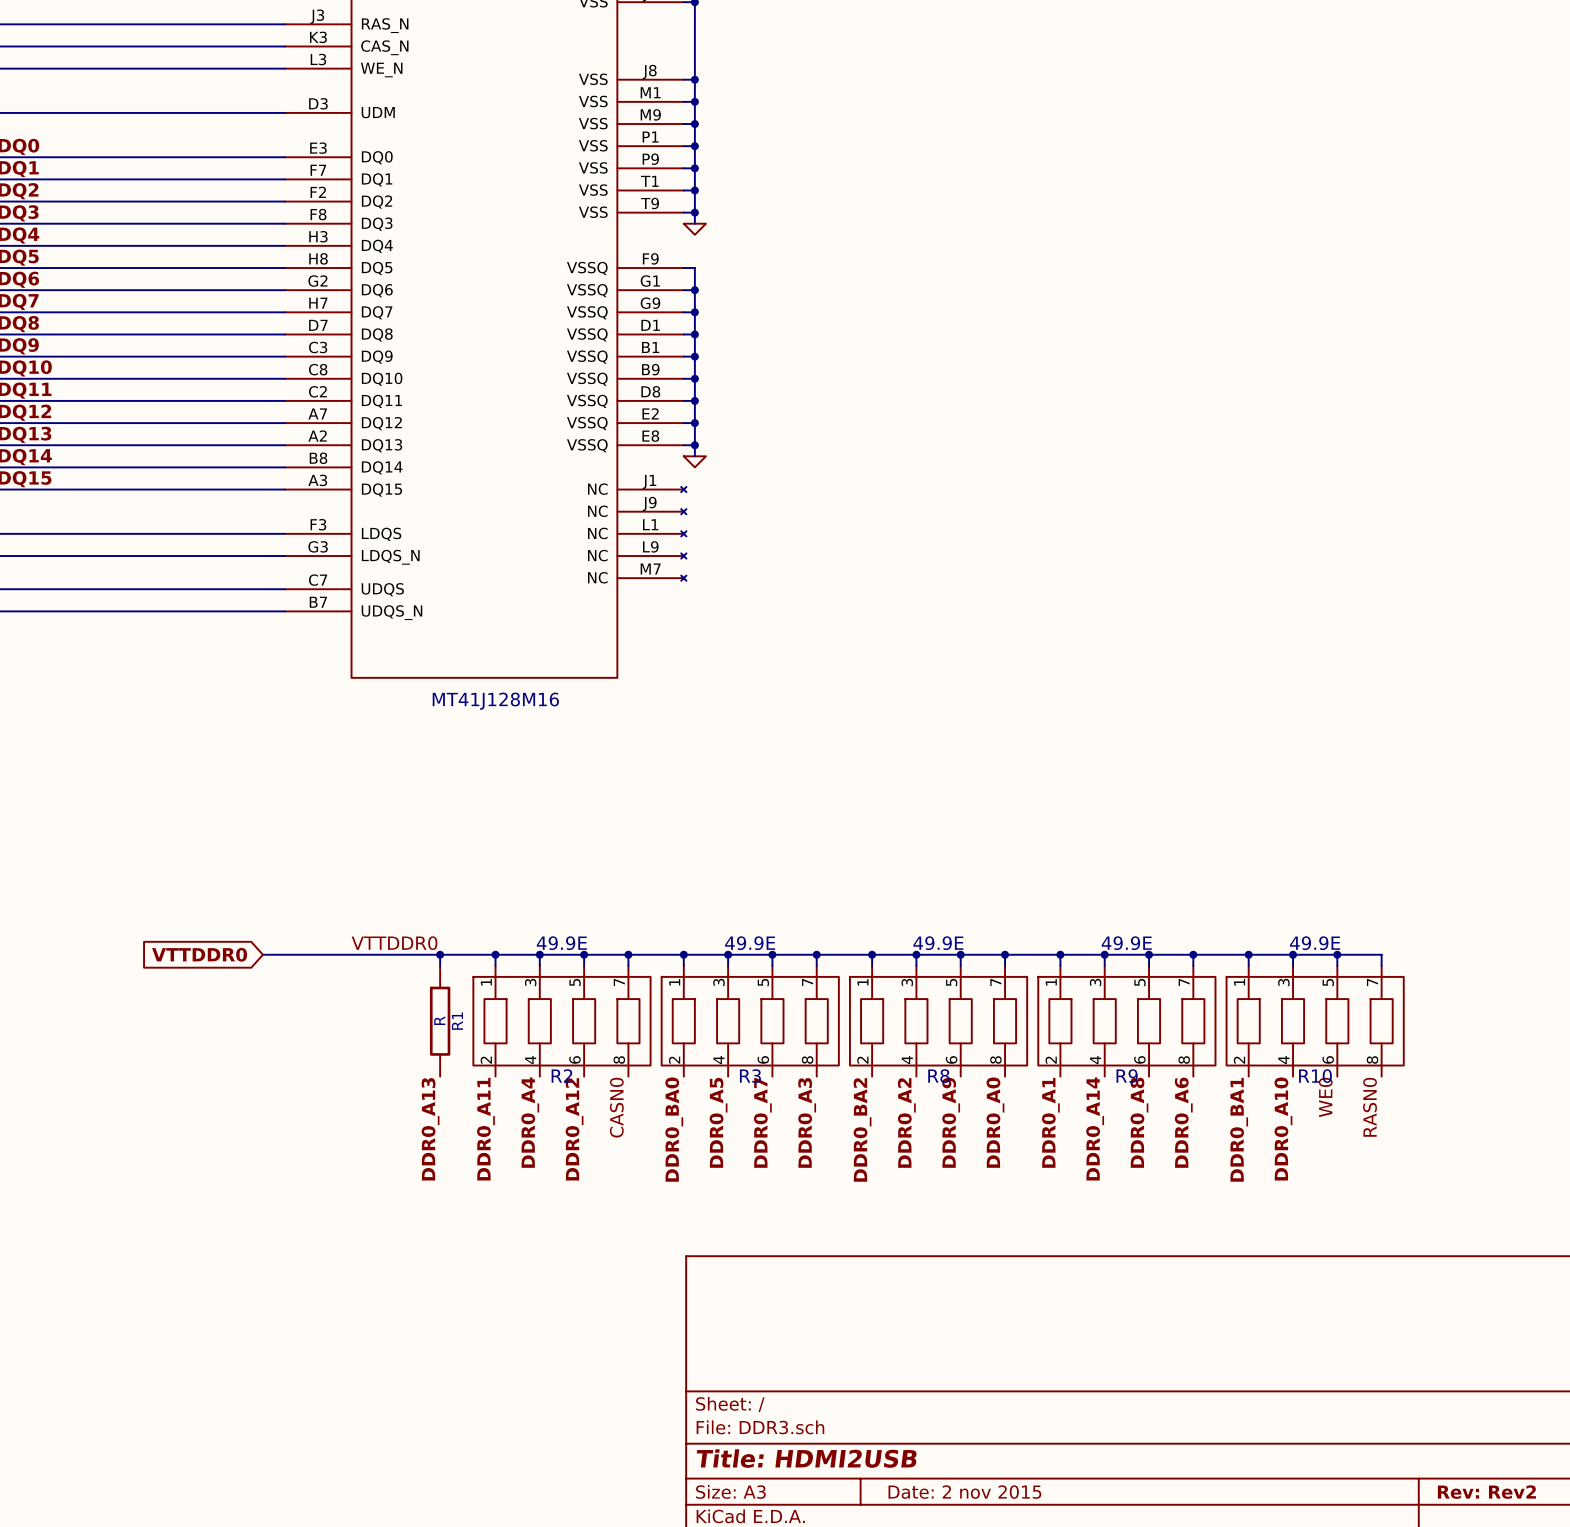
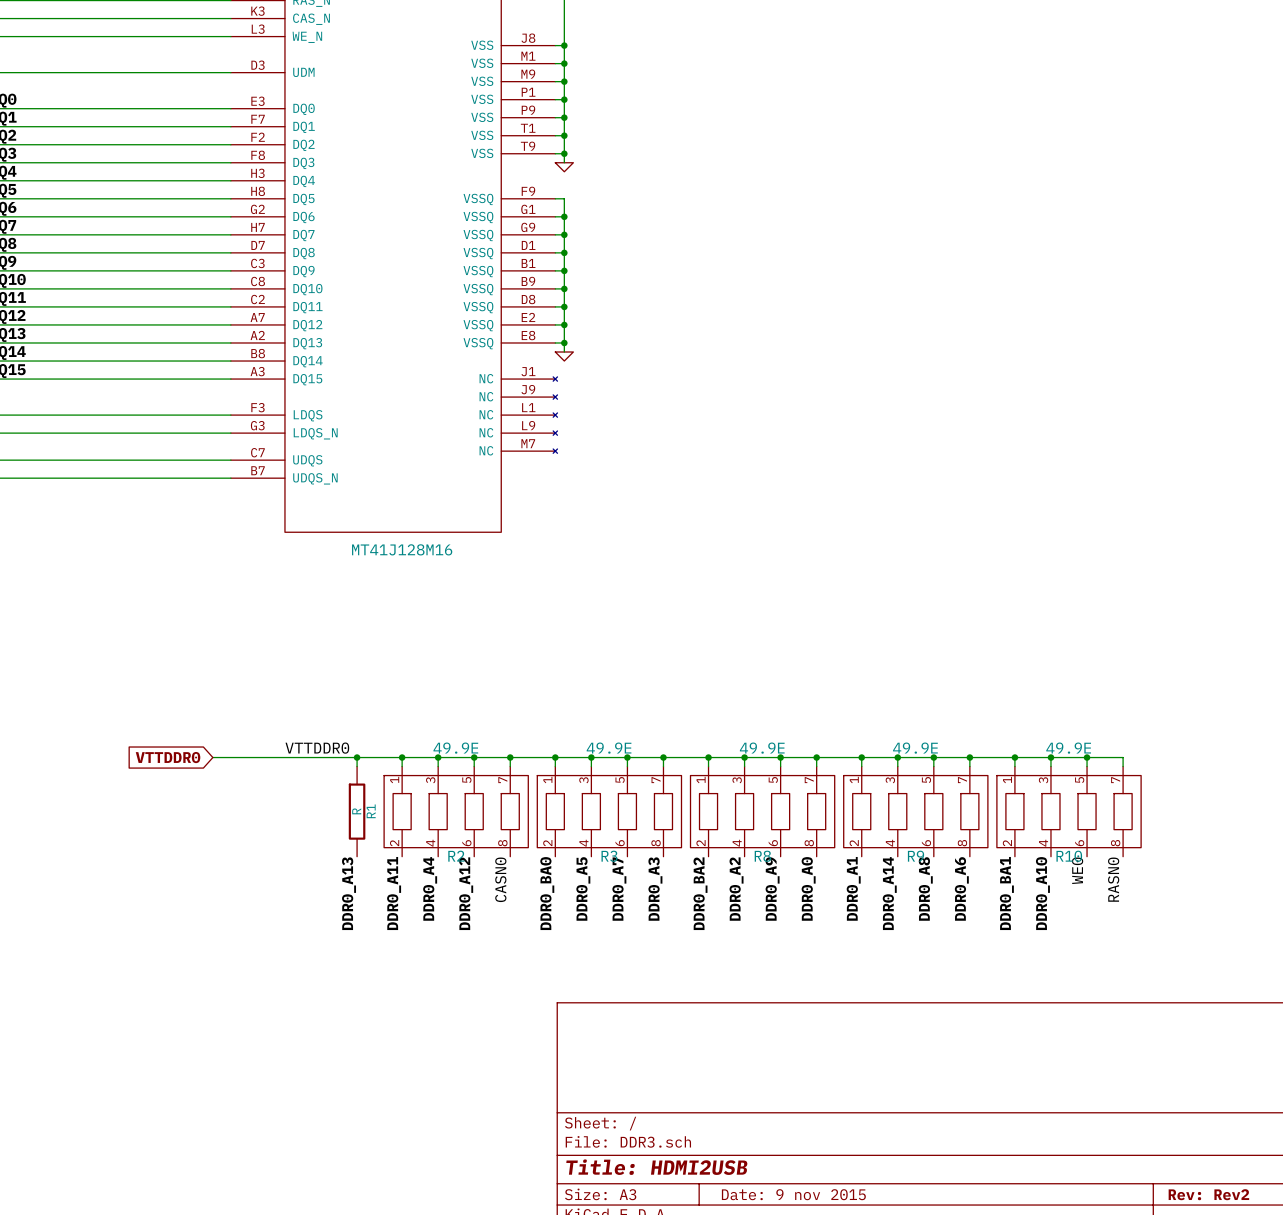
title block: Date: 2 nov 2015 (964, 1492) -> Date: 9 nov 2015 (793, 1194)

